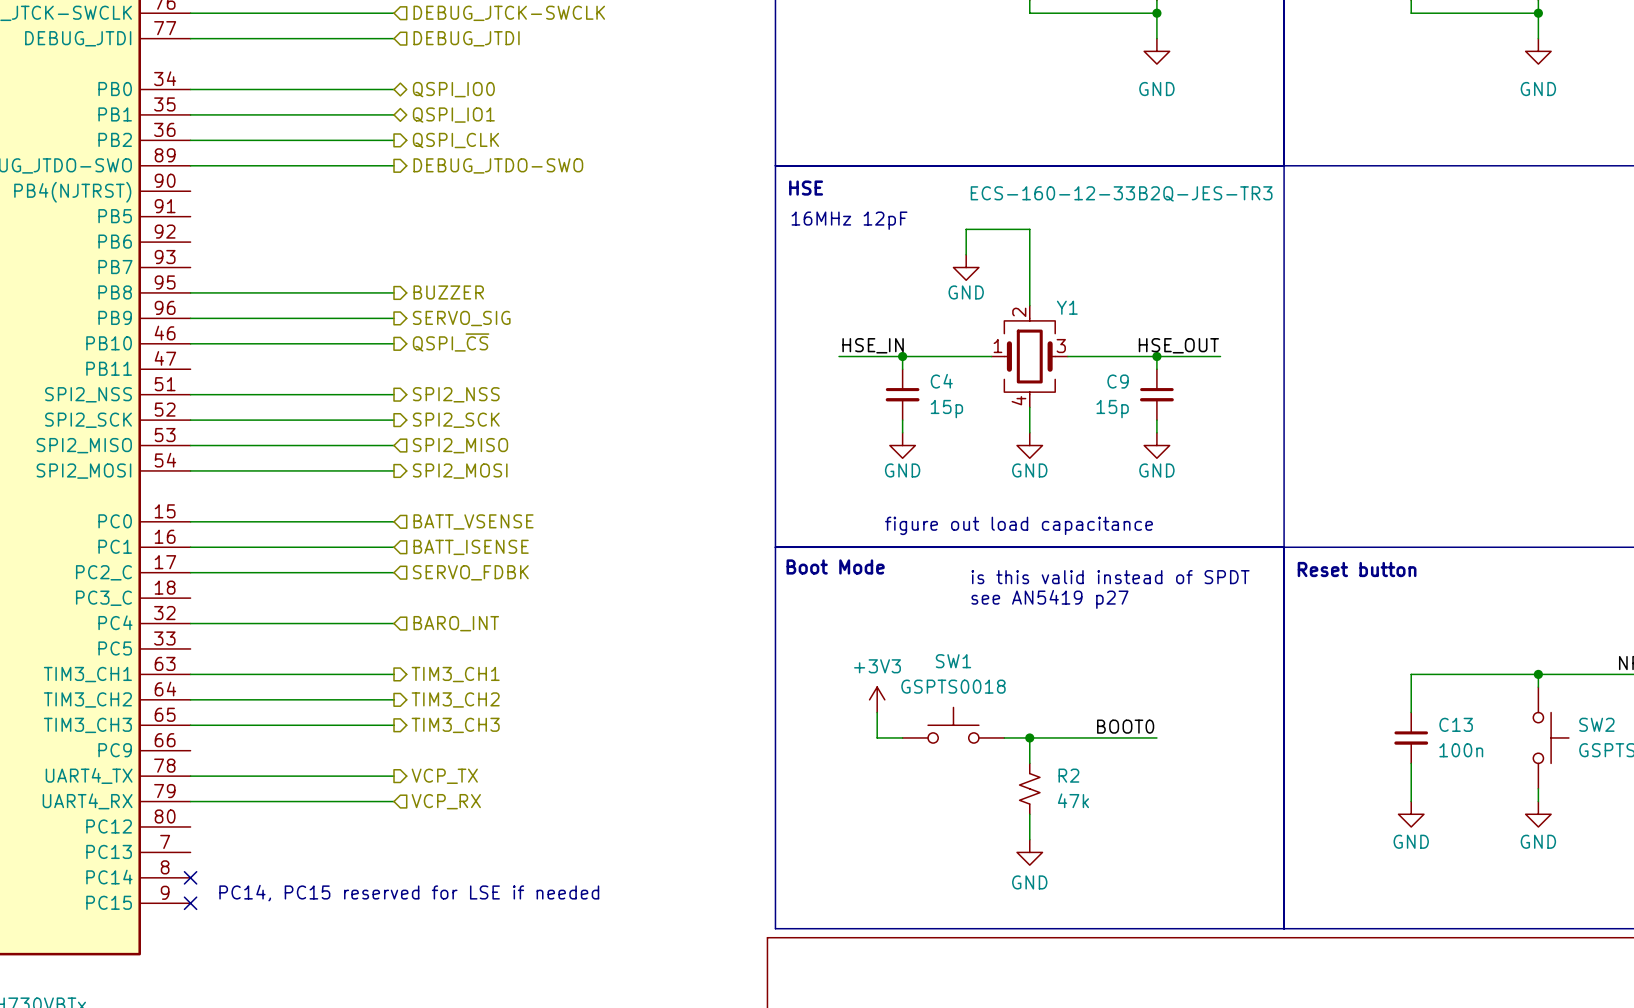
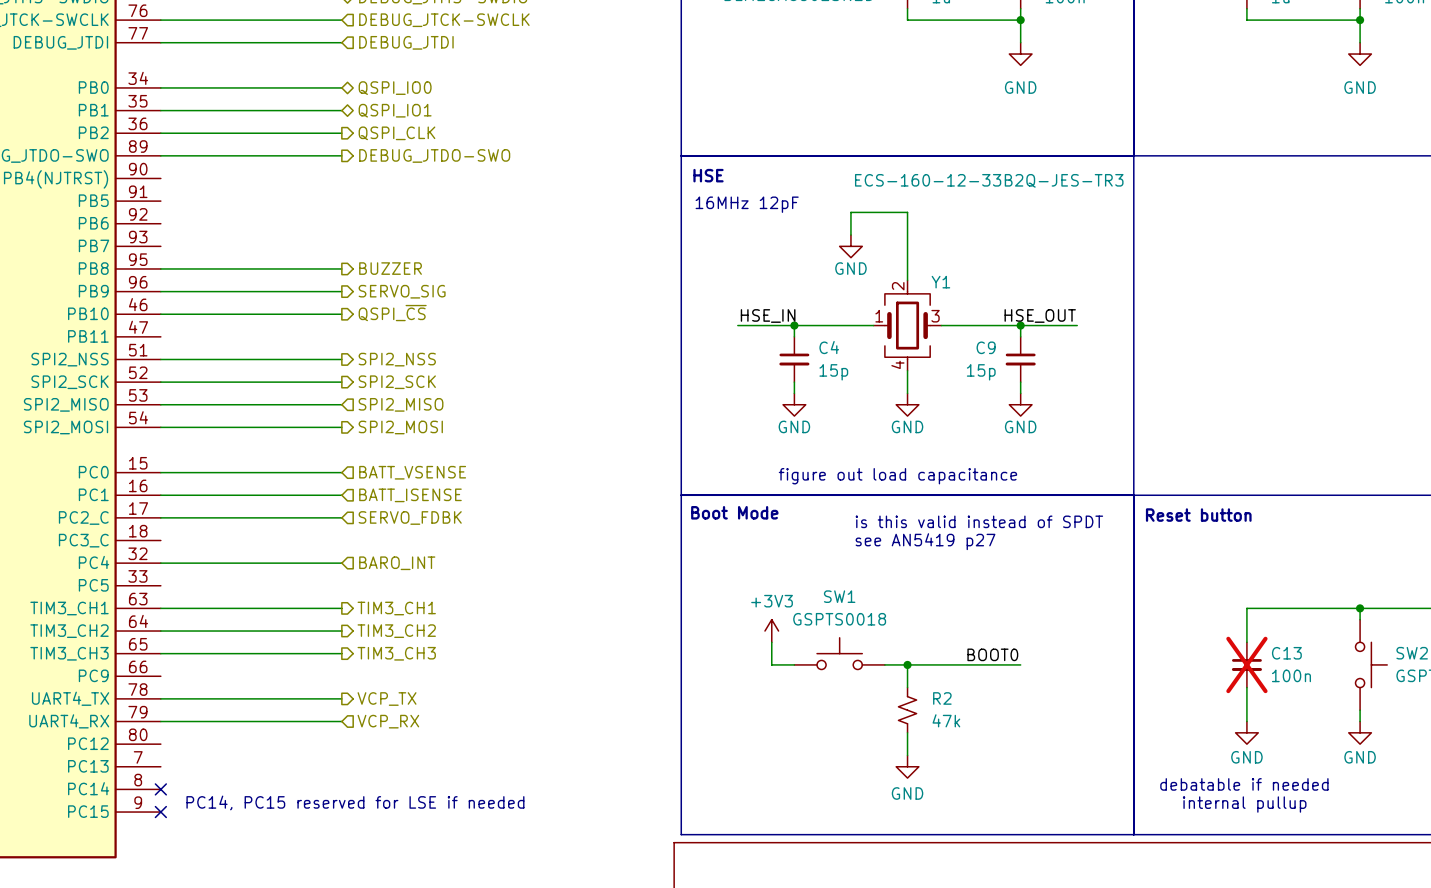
C13 do-not-place cross: none -> (1246, 664)
text: none -> debatable if needed (1244, 784)
text: none -> internal pullup (1244, 804)

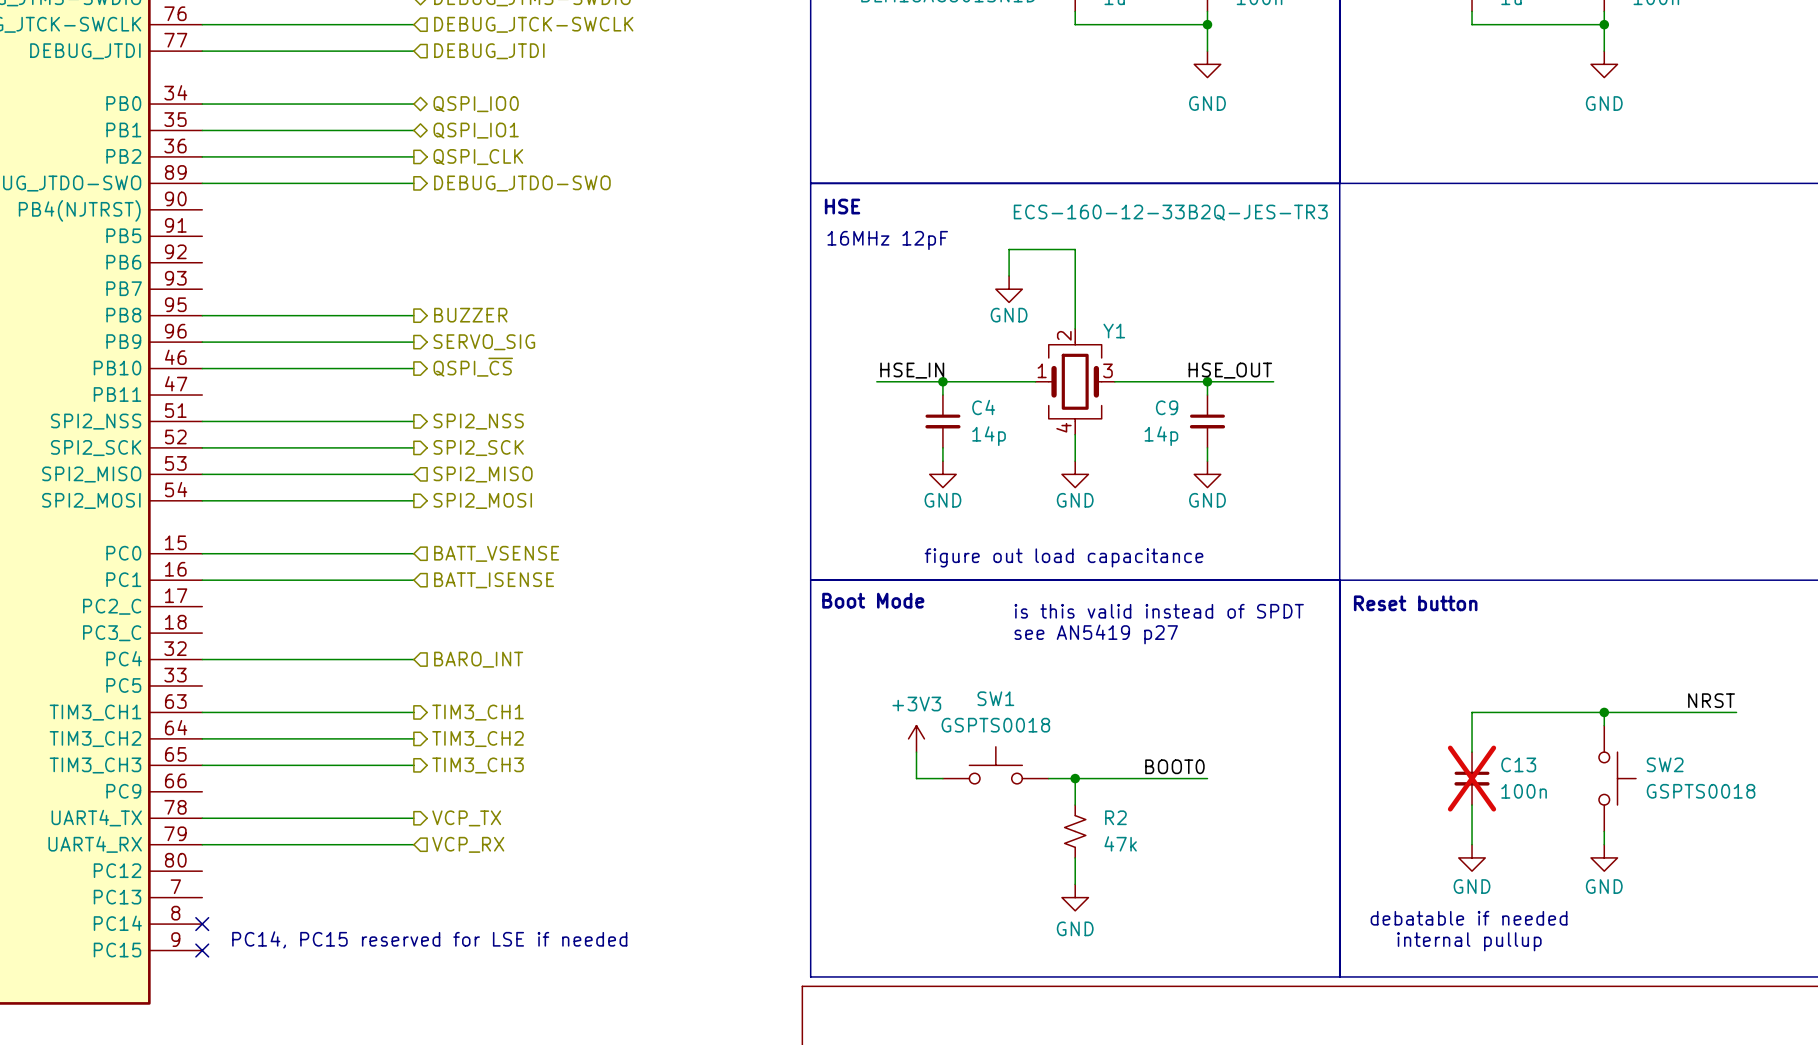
C4 value: 15p (833, 372) -> 14p (989, 436)
C9 value: 15p (981, 372) -> 14p (1161, 436)
wire: (160, 517) (341, 517) -> none
hierarchical label: SERVO_FDBK (410, 517) -> none

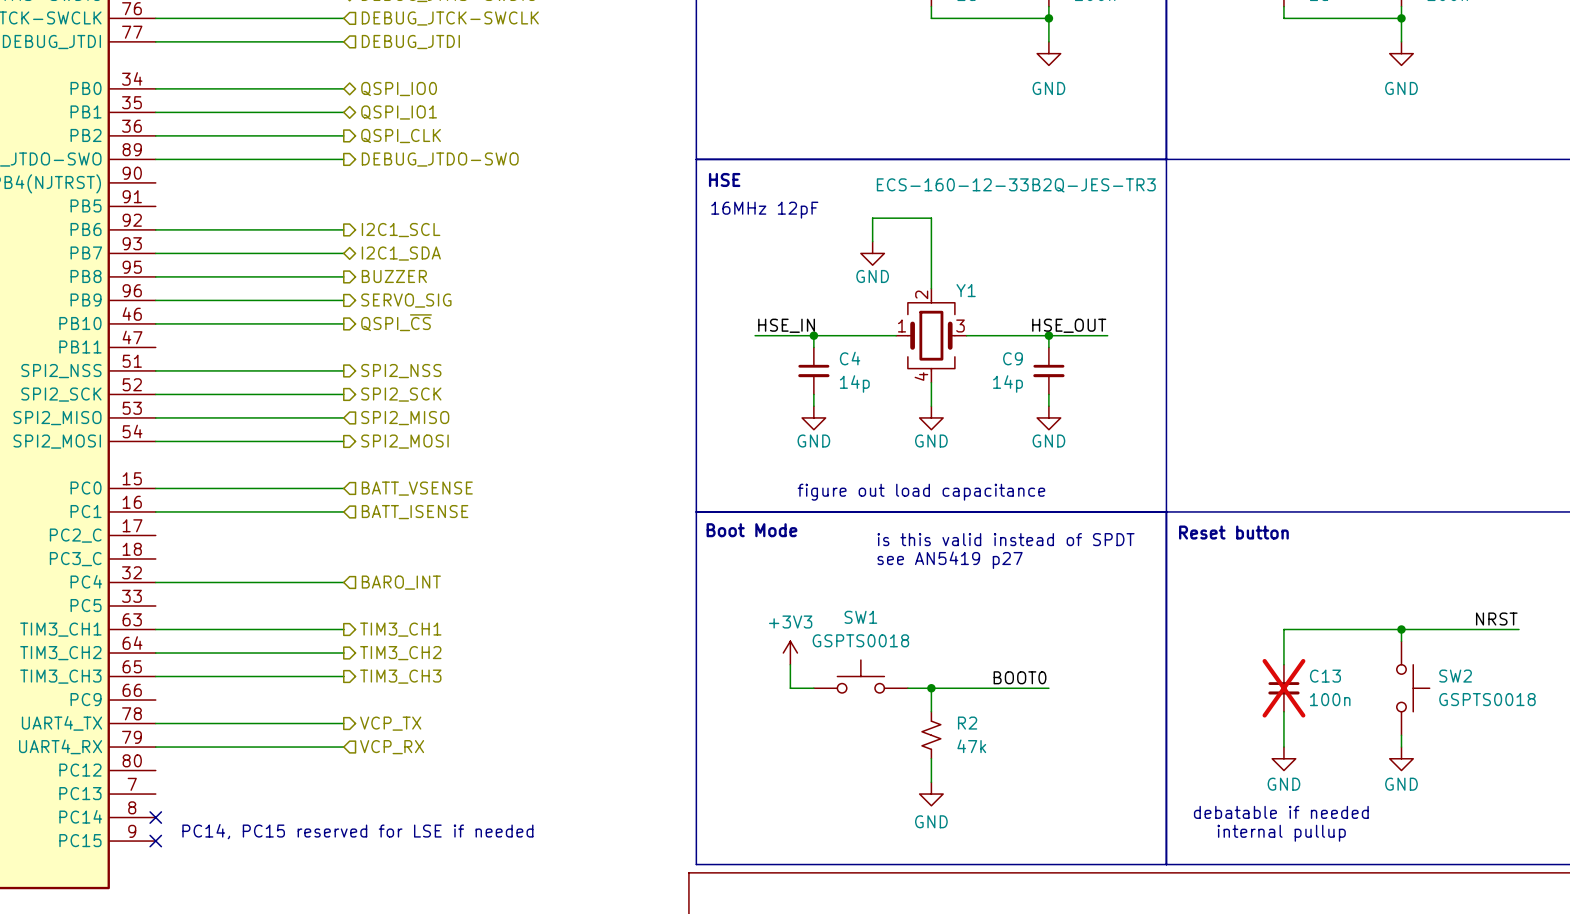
wire: none -> (155, 229) (343, 229)
hierarchical label: none -> I2C1_SCL (401, 230)
wire: none -> (155, 253) (343, 253)
hierarchical label: none -> I2C1_SDA (401, 253)

